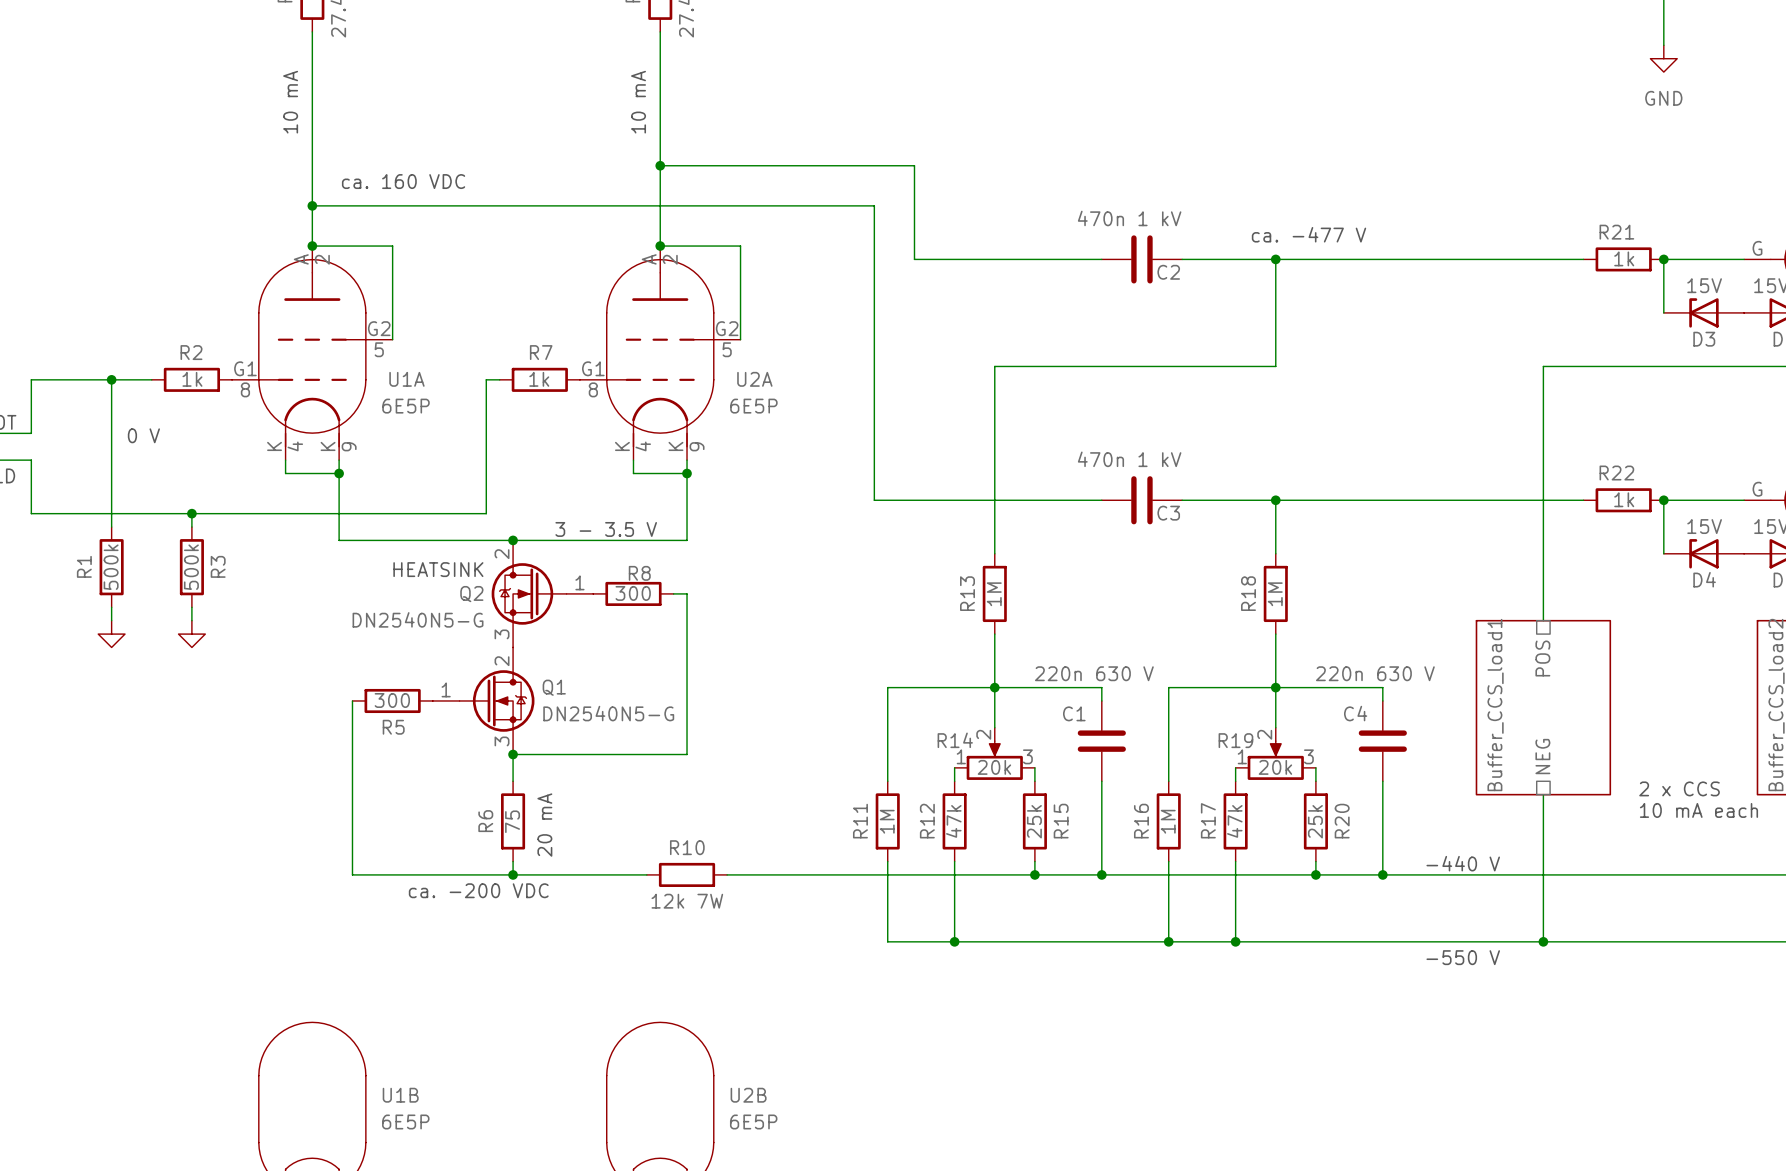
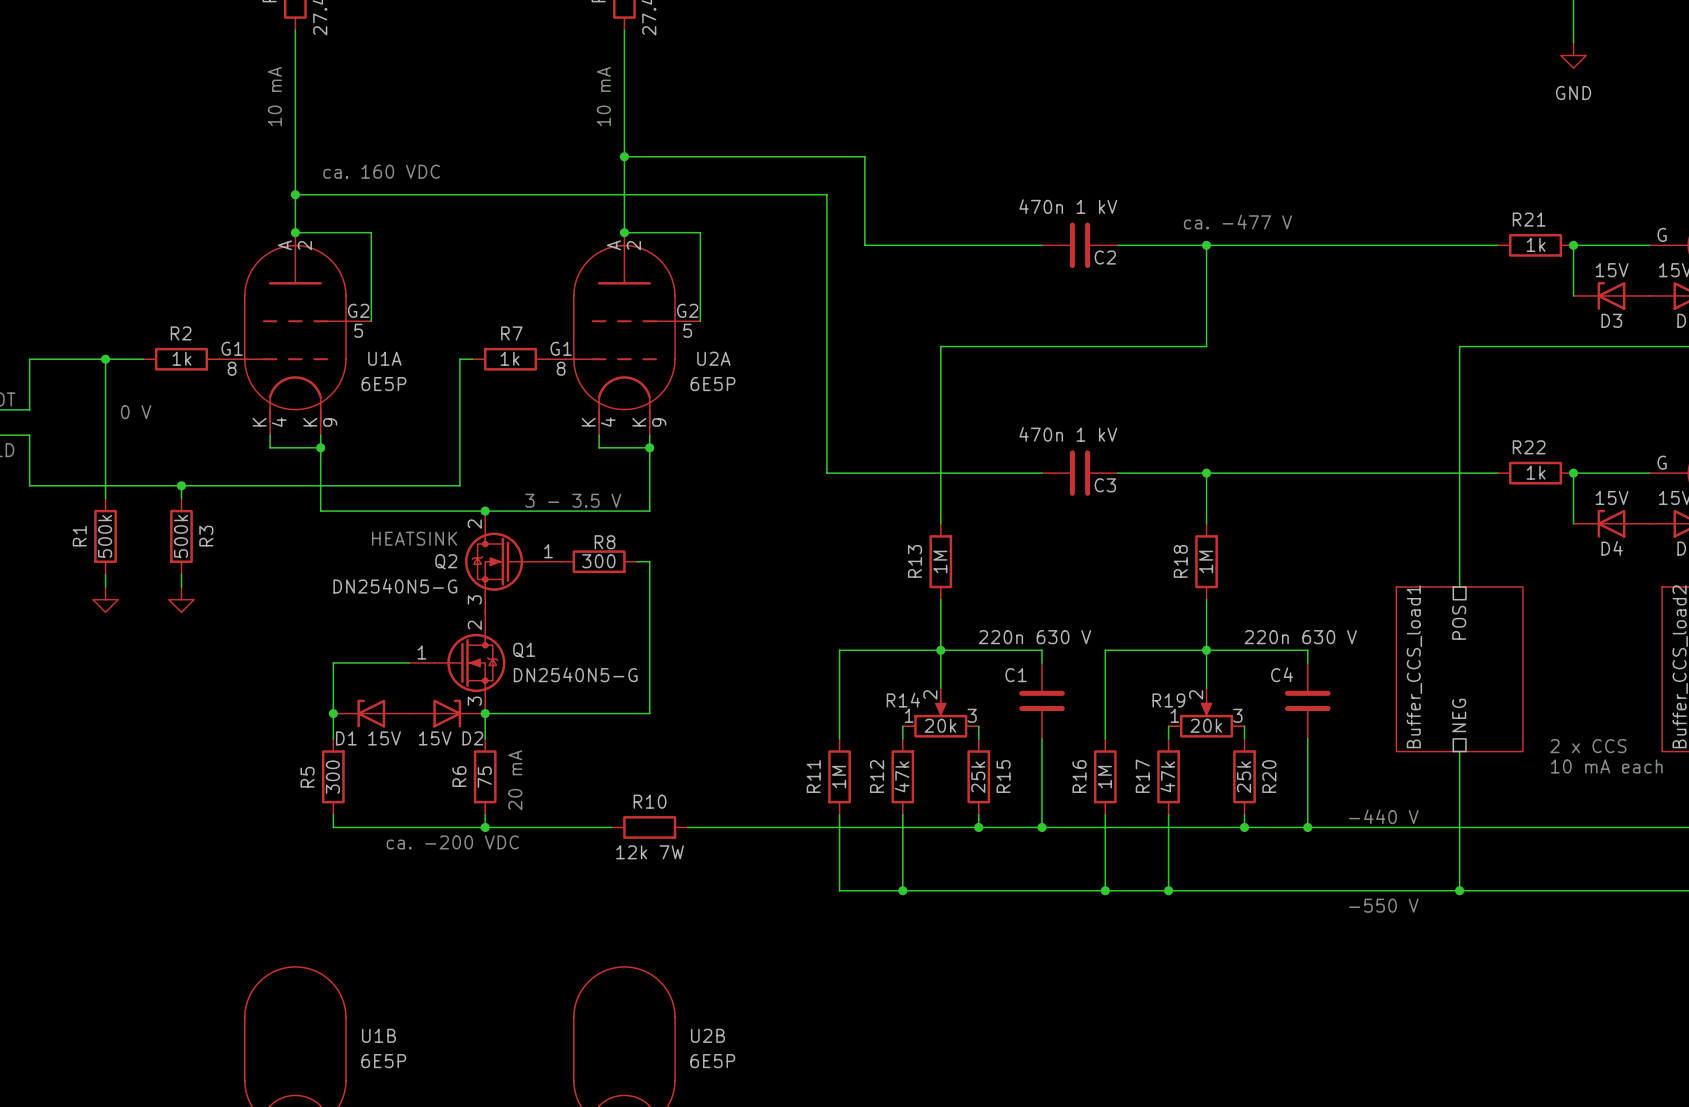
wire: none -> (333, 662) (409, 662)
R5 rotation: 0° (392, 700) -> 90° clockwise (333, 776)
R5 position: (392, 700) -> (333, 776)
junction: none -> (333, 713)
D1: none -> 15V (371, 713)
D2: none -> 15V (447, 713)
wire: (352, 781) (352, 861) -> none

